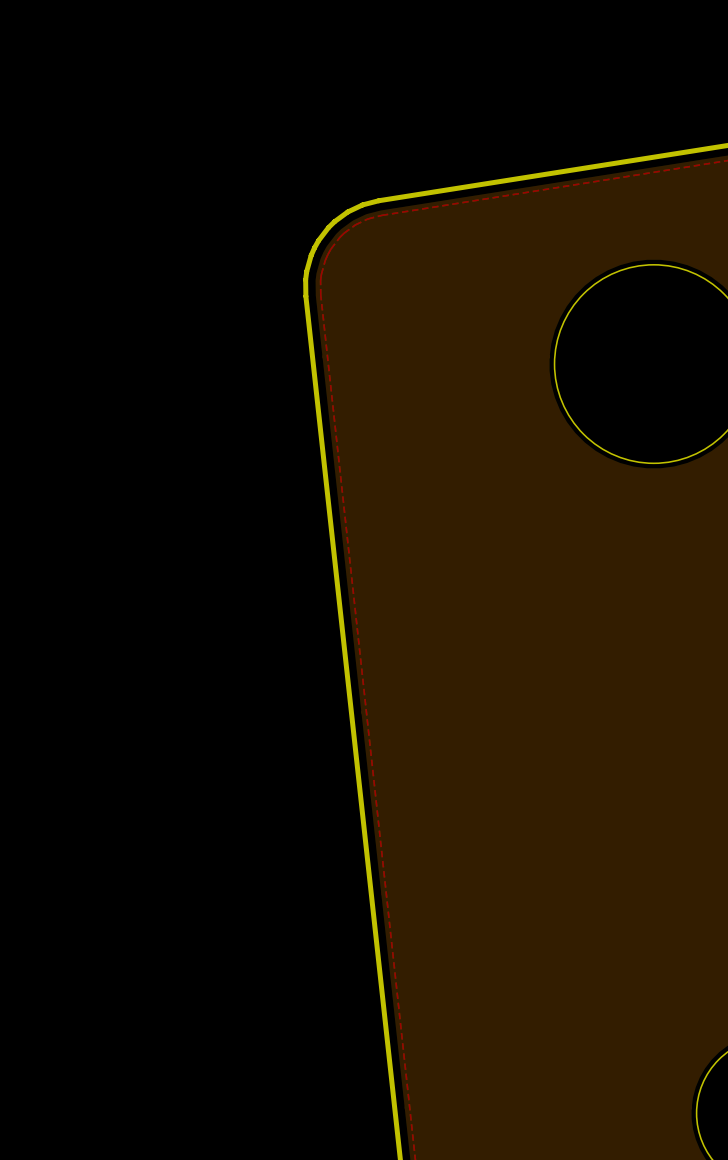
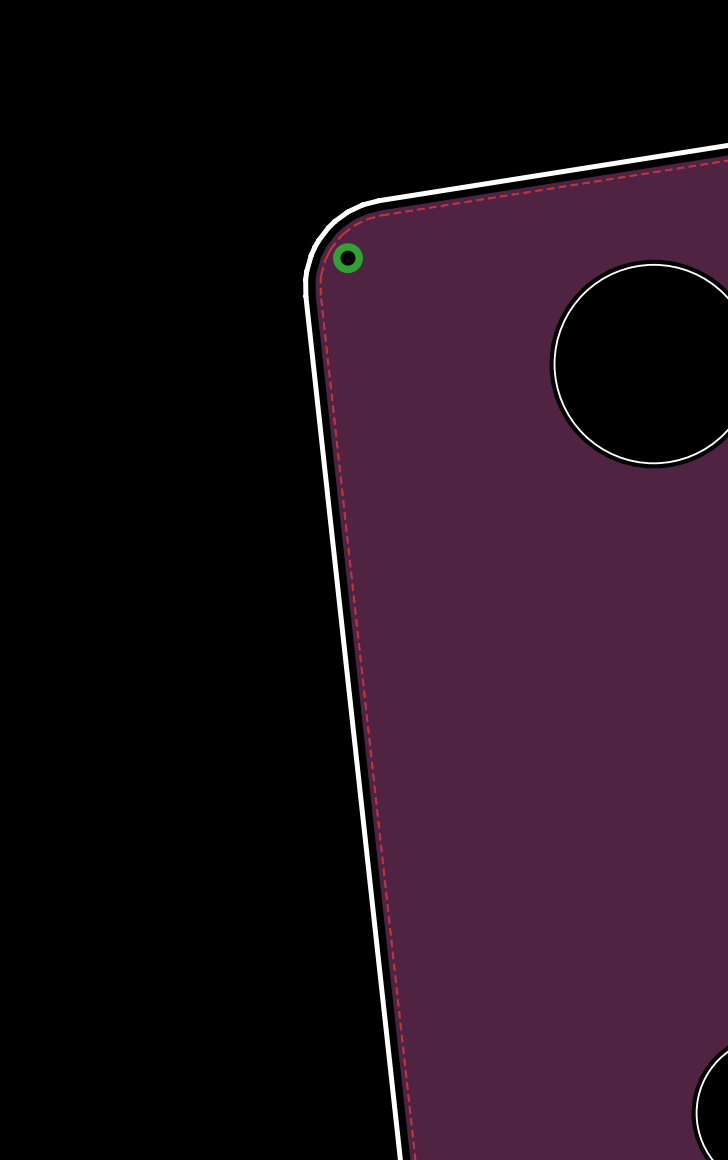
via: none -> (347, 258)

